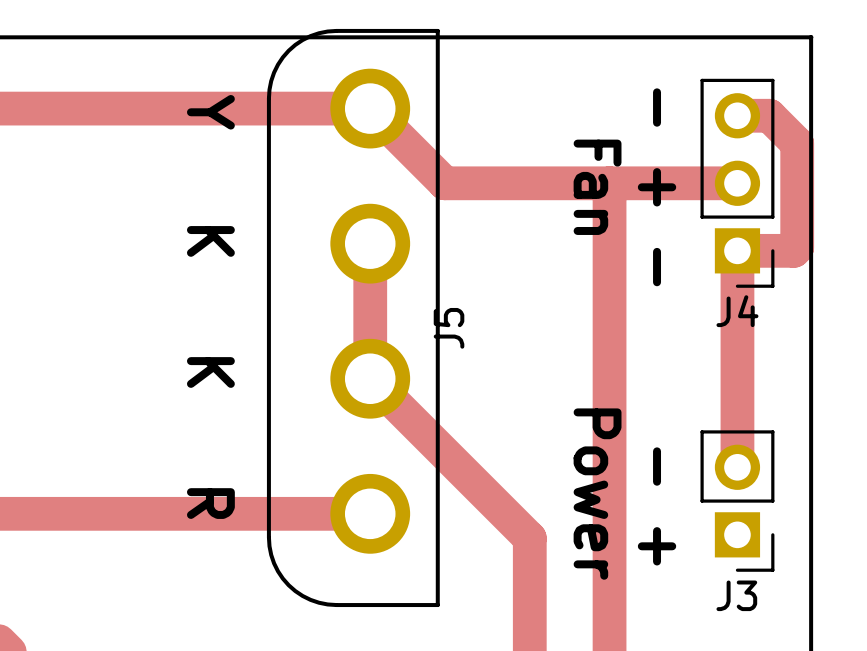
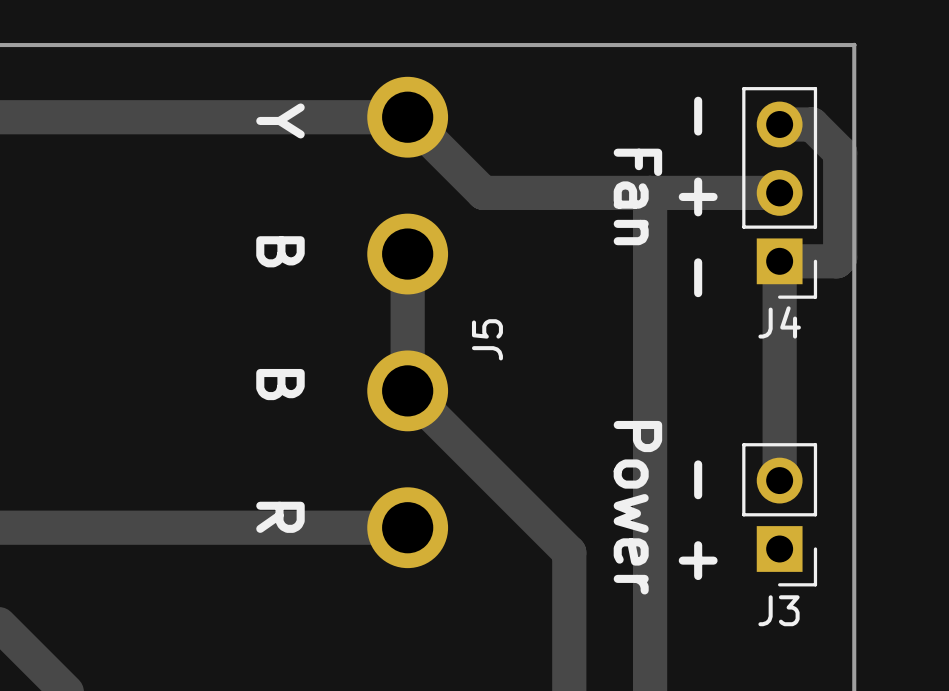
J5 footprint: [266, 28, 440, 608] -> [367, 76, 449, 569]
text: Y K K R (210, 306) -> Y B B R (280, 318)

